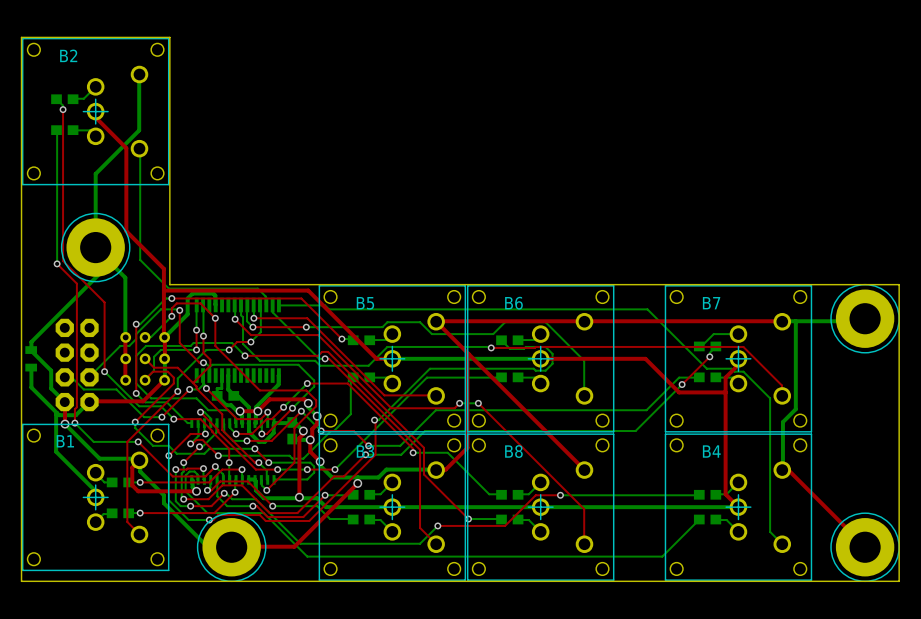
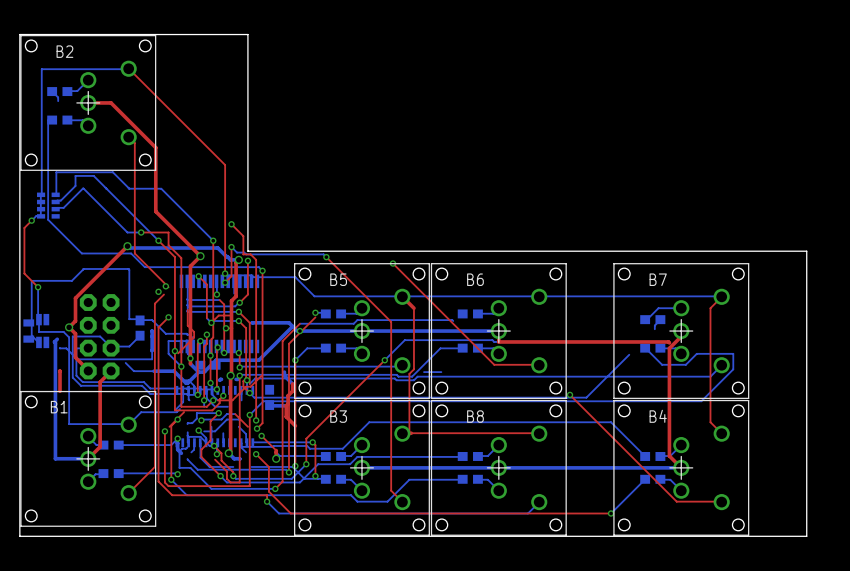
board edge: (169, 37) (169, 284) (899, 284) (899, 581) (874, 581) -> (156, 34) (247, 34) (247, 251) (806, 251) (806, 536)
bottom track: none -> (128, 68) (41, 69) (41, 216) (36, 216) (31, 220)
top track: none -> (128, 68) (225, 164) (225, 273)
bottom track: (139, 75) (139, 130) (95, 173) (95, 247) -> none
top track: (63, 109) (63, 260) (104, 302) (104, 371) -> none
via: (63, 109) -> none
top track: (95, 111) (95, 117) (126, 148) (126, 231) (163, 268) (164, 358) -> (88, 102) (111, 102) (155, 147) (155, 211) (200, 256) (190, 266) (190, 363)
bottom track: (56, 130) (57, 263) -> (52, 120) (48, 120) (48, 219) (81, 253) (131, 253) (144, 267) (258, 267) (262, 270)
bottom track: (139, 148) (140, 259) (168, 288) (257, 288) (265, 296) (266, 304) -> none
top track: none -> (128, 137) (134, 143) (134, 253) (168, 287)
bottom track: none -> (55, 194) (56, 172) (112, 172) (129, 188) (161, 188) (213, 240)
bottom track: none -> (55, 202) (60, 200) (75, 185) (75, 175) (93, 175) (158, 240)
part: none -> (48, 205)
bottom track: none -> (55, 209) (63, 207) (83, 188) (127, 232) (141, 232)
top track: none -> (31, 220) (24, 227) (24, 273) (38, 287)
via: none -> (31, 220)
top track: none -> (231, 224) (243, 236) (243, 254) (250, 254) (256, 259) (256, 420)
via: none -> (231, 224)
bottom track: (95, 247) (125, 277) (125, 337) -> none
bottom track: (95, 247) (109, 263) (31, 342) (31, 350) (51, 370) (51, 388) (64, 402) -> none
part: (95, 247) -> none
top track: none -> (141, 232) (168, 232) (168, 245) (181, 258) (181, 304)
via: none -> (141, 232)
top track: none -> (158, 240) (174, 257) (174, 410) (212, 410) (223, 395)
via: none -> (158, 240)
top track: none -> (213, 240) (213, 337) (211, 339) (210, 383)
via: none -> (213, 240)
top track: (57, 263) (76, 283) (76, 407) (74, 409) (74, 423) -> none
via: (57, 263) -> none
bottom track: none -> (127, 246) (129, 248) (217, 248) (230, 259) (238, 259)
top track: none -> (127, 246) (75, 298) (75, 321) (69, 327) (75, 333) (75, 357) (88, 370)
via: none -> (127, 246)
bottom track: none -> (231, 247) (236, 252) (246, 254) (323, 254) (326, 257)
top track: none -> (231, 247) (231, 276) (225, 282)
via: none -> (231, 247)
via: none -> (200, 256)
via: none -> (326, 257)
top track: none -> (238, 259) (236, 262) (236, 296) (231, 300) (230, 451) (228, 453)
via: none -> (238, 259)
top track: none -> (247, 260) (247, 294) (239, 302)
via: none -> (247, 260)
top track: none -> (392, 263) (494, 364) (539, 365)
via: none -> (392, 263)
top track: (163, 290) (308, 290) (376, 358) (392, 358) -> none
top track: none -> (262, 270) (262, 423) (257, 428)
via: none -> (262, 270)
via: none -> (225, 273)
bottom track: (171, 298) (165, 298) (140, 324) (136, 324) -> none
top track: (171, 298) (301, 298) (341, 339) -> none
via: (171, 298) -> none
top track: none -> (198, 276) (206, 284) (206, 318)
via: none -> (198, 276)
bottom track: (196, 304) (196, 330) -> none
bottom track: (215, 304) (215, 295) (213, 293) (192, 293) (187, 298) (187, 314) (164, 337) -> none
bottom track: (241, 304) (243, 343) (259, 360) (315, 360) (320, 365) (368, 365) (383, 350) -> (299, 323) (353, 323)
bottom track: (247, 304) (246, 321) (252, 327) -> none
bottom track: (259, 304) (260, 332) (250, 342) -> none
bottom track: (272, 304) (272, 312) (319, 358) (322, 358) -> (251, 322) (288, 322) (297, 331)
bottom track: (278, 304) (325, 305) -> (225, 273) (226, 275) (251, 275) (253, 277) (295, 277) (299, 281)
via: none -> (225, 282)
bottom track: (329, 309) (647, 309) (706, 368) (731, 368) (734, 371) (743, 371) (770, 398) (770, 531) (782, 544) -> (303, 285) (314, 296) (721, 296)
bottom track: (179, 310) (160, 309) (136, 334) (136, 339) (129, 345) (120, 345) (89, 377) -> none
top track: (179, 310) (179, 342) (199, 362) (203, 362) -> none
bottom track: none -> (38, 287) (39, 331) (63, 331) (69, 337) (69, 424) (128, 424) (141, 412) (176, 412) (179, 409)
via: none -> (38, 287)
bottom track: (171, 316) (151, 337) (145, 337) -> none
top track: (171, 316) (171, 308) (176, 303) (200, 303) (215, 318) (215, 345) (259, 390) (306, 390) (316, 400) (316, 406) (294, 428) (294, 462) (266, 490) -> none
via: (215, 318) -> none
top track: (253, 318) (307, 318) (384, 395) (436, 395) -> none
via: (253, 318) -> none
bottom track: (865, 318) (863, 321) (782, 321) -> none
part: (865, 318) -> none
top track: (235, 319) (250, 335) (318, 335) (391, 408) (454, 408) (459, 403) -> none
top track: (436, 321) (782, 321) -> none
bottom track: (795, 321) (795, 409) (782, 422) (782, 470) -> none
top track: (136, 324) (136, 393) -> none
via: (136, 324) -> none
bottom track: none -> (186, 299) (219, 300)
top track: none -> (219, 300) (224, 304) (224, 352)
top track: (252, 327) (306, 327) -> none
via: (252, 327) -> none
bottom track: (306, 327) (382, 327) (387, 322) (420, 322) (431, 334) (493, 334) (505, 322) (545, 322) (584, 360) (584, 395) -> none
via: (306, 327) -> none
bottom track: none -> (239, 302) (235, 306) (186, 305)
via: none -> (239, 302)
via: (196, 330) -> none
part footprint: [120, 332, 170, 386] -> [135, 315, 145, 341]
top track: (448, 334) (584, 469) -> (413, 308) (413, 369) (409, 373) (409, 433) (402, 433)
via: (203, 336) -> none
top track: (125, 337) (125, 380) -> none
bottom track: none -> (186, 311) (238, 311)
top track: none -> (238, 311) (249, 322) (249, 383)
via: none -> (238, 311)
bottom track: (501, 340) (510, 348) (545, 346) (552, 353) (552, 363) (545, 370) -> none
via: (250, 342) -> none
top track: none -> (168, 317) (158, 327) (158, 481) (172, 495) (267, 495) (267, 501)
via: none -> (168, 317)
top track: none -> (315, 317) (288, 343) (288, 472)
bottom track: none -> (206, 318) (209, 321) (238, 321)
bottom track: (146, 345) (136, 355) (136, 383) (151, 398) (196, 398) (208, 410) (228, 410) (235, 417) (236, 423) -> (134, 319) (129, 319) (128, 269) (83, 269) (71, 280) (31, 280) (31, 335) (38, 342)
bottom track: (152, 345) (232, 342) (245, 355) -> (140, 319) (152, 320) (165, 333) (187, 334)
part: none -> (42, 319)
top track: none -> (238, 321) (246, 328) (246, 378) (243, 381) (243, 386) (249, 393)
via: none -> (238, 321)
top track: (491, 347) (743, 346) (781, 385) (782, 395) -> none
via: (491, 347) -> none
bottom track: (196, 349) (160, 349) (154, 356) (154, 370) (145, 380) -> none
via: (196, 349) -> none
bottom track: (229, 349) (206, 349) (177, 378) (177, 391) -> none
top track: none -> (299, 323) (282, 341) (282, 481) (275, 488)
bottom track: none -> (292, 326) (258, 360) (216, 360) (204, 372) (198, 372)
top track: (468, 353) (467, 447) (445, 469) -> (539, 433) (411, 433)
via: none -> (69, 327)
top track: (251, 355) (318, 355) (322, 351) (328, 351) (424, 447) -> (326, 257) (391, 321) (391, 413)
top track: (709, 356) (682, 384) -> none
via: (709, 356) -> none
top track: (145, 358) (154, 367) (177, 367) (196, 386) -> (181, 322) (181, 356)
bottom track: none -> (299, 331) (361, 331)
top track: (325, 358) (329, 358) (420, 449) (420, 527) (424, 531) -> none
top track: (540, 358) (645, 358) (679, 392) (725, 392) -> (498, 331) (498, 341) (669, 342)
via: (203, 362) -> none
top track: none -> (206, 334) (206, 343) (204, 346) (204, 400)
via: none -> (206, 334)
bottom track: none -> (140, 335) (129, 346) (111, 346) (111, 348)
part position: (77, 365) -> (99, 336)
bottom track: (31, 367) (31, 387) (59, 415) (75, 415) (89, 402) -> none
bottom track: none -> (186, 340) (168, 341) (168, 353) (181, 366)
bottom track: (438, 368) (429, 368) (378, 420) (374, 420) -> (404, 340) (384, 360)
top track: none -> (200, 341) (197, 343) (197, 394)
via: none -> (200, 341)
part: none -> (42, 342)
bottom track: (104, 371) (139, 406) (160, 406) (173, 419) -> none
via: (104, 371) -> none
bottom track: (209, 375) (209, 367) (212, 364) (298, 364) (314, 380) (314, 386) (292, 408) -> none
bottom track: (222, 375) (221, 388) (217, 388) (217, 396) (226, 405) (231, 405) (242, 416) (242, 423) -> none
bottom track: (228, 375) (228, 389) (248, 407) (248, 431) (258, 441) (264, 441) (273, 432) (274, 423) (295, 423) (303, 431) -> none
bottom track: (278, 375) (278, 384) (255, 407) (255, 423) -> none
bottom track: none -> (111, 347) (100, 336) (72, 336) (72, 377) (80, 385) (142, 385) (150, 393) (197, 394)
top track: none -> (217, 347) (216, 389)
via: none -> (217, 347)
bottom track: none -> (88, 348) (76, 348) (76, 375) (82, 382) (143, 382) (150, 388) (216, 389)
bottom track: (353, 377) (350, 378) (350, 414) (334, 431) -> (325, 348) (307, 348) (295, 360)
bottom track: (477, 377) (426, 377) (335, 469) -> (440, 348) (412, 376) (398, 376) (396, 374) (239, 375)
bottom track: (699, 377) (679, 377) (646, 410) (435, 410) (400, 445) (368, 445) -> (645, 348) (662, 364) (685, 364) (696, 353) (733, 353) (733, 369) (701, 401) (263, 401) (249, 414)
top track: (145, 380) (153, 371) (167, 371) (173, 377) (173, 383) (135, 422) -> none
top track: (164, 380) (143, 401) (89, 402) -> none
via: none -> (174, 351)
via: none -> (224, 352)
top track: none -> (238, 352) (239, 367)
via: none -> (238, 352)
bottom track: (307, 383) (283, 407) -> none
top track: (307, 383) (347, 383) (413, 448) (413, 452) -> none
via: (307, 383) -> none
bottom track: (203, 384) (198, 389) (189, 389) -> none
via: (682, 384) -> none
via: none -> (210, 355)
top track: (196, 388) (222, 414) (222, 430) (254, 462) (258, 462) -> (181, 358) (181, 406) (206, 406) (213, 400)
top track: (206, 388) (237, 419) (260, 419) (267, 412) -> none
bottom track: (116, 389) (144, 417) (161, 417) -> (107, 359) (152, 359) (152, 350)
top track: (189, 389) (161, 417) -> none
via: (189, 389) -> none
top track: none -> (295, 360) (295, 466)
via: none -> (295, 360)
top track: none -> (384, 360) (306, 438) (306, 464)
via: none -> (384, 360)
top track: (177, 391) (127, 441) (127, 521) (139, 534) -> (164, 294) (154, 303) (154, 466) (128, 493)
via: (177, 391) -> none
via: (136, 393) -> none
bottom track: none -> (190, 363) (198, 372)
bottom track: none -> (402, 365) (239, 367)
bottom track: none -> (721, 365) (710, 376) (417, 376) (413, 380) (396, 380) (394, 378) (255, 378) (249, 383)
via: none -> (181, 366)
via: none -> (239, 367)
top track: none -> (111, 370) (100, 382) (100, 446) (88, 458)
bottom track: (166, 402) (187, 423) (191, 423) -> (153, 371) (174, 371) (187, 383) (198, 372)
top track: (308, 403) (304, 399) (269, 399) (257, 411) (240, 411) -> none
via: (308, 403) -> none
via: (459, 403) -> none
top track: (478, 403) (584, 509) (584, 544) -> none
via: (478, 403) -> none
via: none -> (230, 375)
top track: none -> (239, 375) (239, 482) (230, 482) (226, 478) (226, 471) (215, 459)
via: none -> (239, 375)
via: (283, 407) -> none
top track: (292, 408) (266, 433) (261, 433) -> none
via: (292, 408) -> none
via: (240, 411) -> none
via: (257, 411) -> none
bottom track: (301, 411) (321, 431) -> none
top track: (301, 411) (271, 440) (246, 440) -> none
via: (301, 411) -> none
top track: (200, 412) (255, 469) (277, 469) -> none
via: (200, 412) -> none
bottom track: (57, 413) (56, 451) (95, 491) (95, 497) -> (57, 339) (54, 341) (55, 458) (88, 458)
via: none -> (210, 383)
via: (317, 416) -> none
via: (161, 417) -> none
top track: (173, 419) (200, 419) (229, 448) (229, 462) -> none
via: (173, 419) -> none
top track: (374, 420) (375, 454) (309, 520) (265, 520) (259, 515) (218, 515) (213, 520) (209, 520) -> none
via: (374, 420) -> none
bottom track: (135, 422) (135, 428) (153, 445) (168, 445) (176, 453) (204, 453) (209, 448) (246, 448) -> (203, 419) (221, 419) (226, 414)
via: (135, 422) -> none
via: none -> (216, 389)
bottom track: (74, 423) (93, 441) (138, 441) -> none
via: (74, 423) -> none
bottom track: (217, 423) (216, 432) (202, 446) (199, 446) -> none
bottom track: (65, 424) (99, 458) (138, 458) (140, 460) (140, 471) (163, 495) (163, 503) (207, 546) (231, 547) -> none
via: (65, 424) -> none
via: none -> (249, 393)
via: none -> (197, 394)
top track: none -> (569, 394) (676, 501) (721, 502)
via: none -> (569, 394)
via: none -> (223, 395)
top track: (303, 431) (299, 437) (299, 488) -> (261, 435) (276, 450)
via: (303, 431) -> none
top track: (321, 431) (353, 431) (368, 445) -> none
via: (321, 431) -> none
bottom track: (331, 431) (303, 458) (292, 458) (289, 455) (218, 455) -> (305, 397) (254, 397) (249, 393)
bottom track: (424, 431) (401, 454) (365, 454) -> (392, 397) (308, 397)
top track: (205, 433) (190, 433) (168, 455) -> none
via: (205, 433) -> none
bottom track: none -> (204, 400) (204, 406)
via: none -> (204, 400)
via: none -> (213, 400)
via: (236, 433) -> none
via: (261, 433) -> none
via: (310, 439) -> none
via: (246, 440) -> none
top track: (138, 441) (172, 476) (205, 476) (215, 466) -> none
via: (138, 441) -> none
top track: (190, 443) (196, 439) (202, 439) (218, 455) -> none
via: (190, 443) -> none
via: (368, 445) -> none
via: (199, 446) -> none
bottom track: none -> (218, 413) (196, 413) (196, 418) (192, 423) (187, 424)
top track: none -> (218, 413) (210, 421) (210, 440) (201, 449) (201, 456) (220, 476)
via: none -> (218, 413)
via: (254, 448) -> none
top track: none -> (249, 414) (249, 486) (168, 486) (164, 482) (164, 431)
via: none -> (249, 414)
bottom track: (413, 452) (447, 452) (489, 494) (501, 494) -> (220, 476) (226, 482) (299, 482) (318, 464) (350, 464) (357, 456) (462, 456)
via: (413, 452) -> none
bottom track: none -> (239, 418) (226, 419) (215, 431) (204, 431)
top track: none -> (177, 419) (171, 425) (171, 479)
via: none -> (177, 419)
top track: (365, 454) (343, 476) (334, 476) (297, 513) (269, 513) (242, 485) (222, 485) (208, 499) (183, 499) -> none
via: (365, 454) -> none
bottom track: (168, 455) (168, 500) (188, 520) (209, 520) -> none
via: (168, 455) -> none
via: none -> (256, 420)
top track: (139, 460) (132, 467) (132, 485) (138, 491) (196, 491) -> none
bottom track: (320, 461) (320, 465) (332, 477) (378, 477) (386, 469) (436, 470) -> none
via: (320, 461) -> none
bottom track: (183, 462) (183, 471) (181, 473) (181, 497) (183, 499) -> none
via: (183, 462) -> none
via: (229, 462) -> none
via: (258, 462) -> none
bottom track: (268, 462) (310, 462) (314, 466) (314, 472) (307, 479) -> (312, 442) (283, 442)
via: (268, 462) -> none
via: none -> (257, 428)
via: none -> (164, 431)
top track: (203, 468) (175, 469) -> none
via: (203, 468) -> none
bottom track: (175, 469) (175, 501) (180, 506) (190, 506) -> none
via: (175, 469) -> none
top track: (242, 469) (222, 469) (209, 482) (140, 482) -> none
via: (242, 469) -> none
bottom track: (277, 469) (307, 469) -> none
via: (277, 469) -> none
top track: (307, 469) (335, 469) -> none
via: (307, 469) -> none
via: (335, 469) -> none
top track: (782, 470) (788, 470) (865, 547) -> (721, 433) (710, 422) (710, 308) (721, 296)
bottom track: none -> (187, 435) (200, 436) (209, 445) (214, 445)
via: none -> (261, 435)
top track: (424, 474) (468, 519) -> (391, 437) (391, 490)
bottom track: none -> (177, 438) (171, 445) (129, 445)
via: none -> (177, 438)
bottom track: (198, 479) (197, 474) (194, 471) (189, 471) (185, 475) (185, 491) (207, 513) (263, 513) (307, 556) -> (267, 501) (278, 513) (283, 513)
bottom track: (248, 479) (254, 479) (255, 490) (263, 498) (317, 498) (326, 507) (392, 507) -> none
top track: none -> (312, 442) (315, 445) (315, 476)
via: none -> (312, 442)
via: (140, 482) -> none
top track: none -> (214, 445) (221, 453) (221, 460) (233, 472) (233, 476)
via: none -> (214, 445)
top track: (357, 483) (294, 546) (231, 547) -> none
via: (357, 483) -> none
bottom track: none -> (187, 447) (179, 451) (179, 467) (190, 467) (211, 488) (275, 488)
top track: (207, 490) (211, 490) (220, 481) (247, 481) (272, 506) -> none
via: (207, 490) -> none
via: (266, 490) -> none
via: (196, 491) -> none
bottom track: none -> (228, 453) (234, 458) (239, 459)
via: none -> (228, 453)
top track: (235, 492) (214, 513) (140, 513) -> none
top track: none -> (256, 454) (268, 466) (268, 491) (290, 513) (611, 513)
via: none -> (256, 454)
bottom track: (224, 493) (232, 499) (255, 499) (300, 543) (387, 543) -> (171, 479) (186, 495) (351, 495) (357, 501)
top track: (224, 493) (211, 506) (190, 506) -> none
via: (224, 493) -> none
bottom track: (353, 494) (325, 495) -> (325, 456) (279, 456) (276, 452)
bottom track: (699, 494) (560, 495) -> (645, 456) (611, 422) (369, 422) (342, 448) (309, 448) (307, 445) (239, 447)
top track: (325, 495) (303, 517) (267, 517) (256, 506) (252, 506) -> none
via: (325, 495) -> none
top track: (560, 495) (535, 495) (505, 525) (437, 525) -> none
via: (560, 495) -> none
bottom track: none -> (187, 459) (197, 469) (286, 469) (288, 472)
via: (183, 499) -> none
bottom track: none -> (306, 464) (291, 478) (236, 478) (233, 476)
via: none -> (306, 464)
via: none -> (295, 466)
via: (190, 506) -> none
via: (252, 506) -> none
via: (272, 506) -> none
via: none -> (288, 472)
bottom track: none -> (129, 473) (177, 474)
via: (140, 513) -> none
via: none -> (177, 474)
via: none -> (220, 476)
via: none -> (233, 476)
via: none -> (315, 476)
bottom track: (468, 519) (501, 519) -> (403, 485) (409, 479) (462, 479)
via: (468, 519) -> none
via: none -> (171, 479)
via: (209, 520) -> none
via: (437, 525) -> none
via: none -> (275, 488)
via: none -> (267, 501)
part: (231, 547) -> none
part: (865, 547) -> none
bottom track: (572, 556) (662, 556) -> (528, 513) (539, 502)
via: none -> (611, 513)

